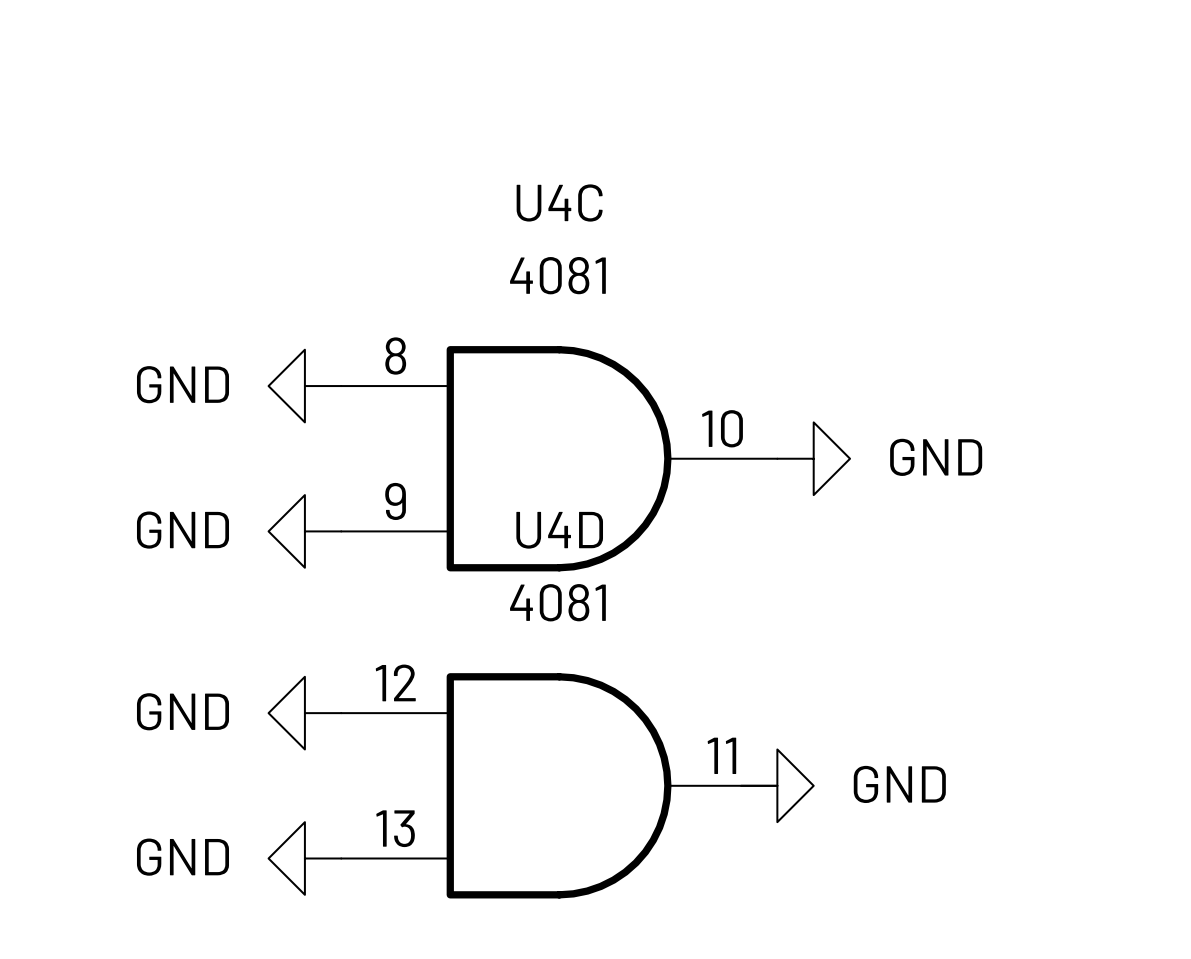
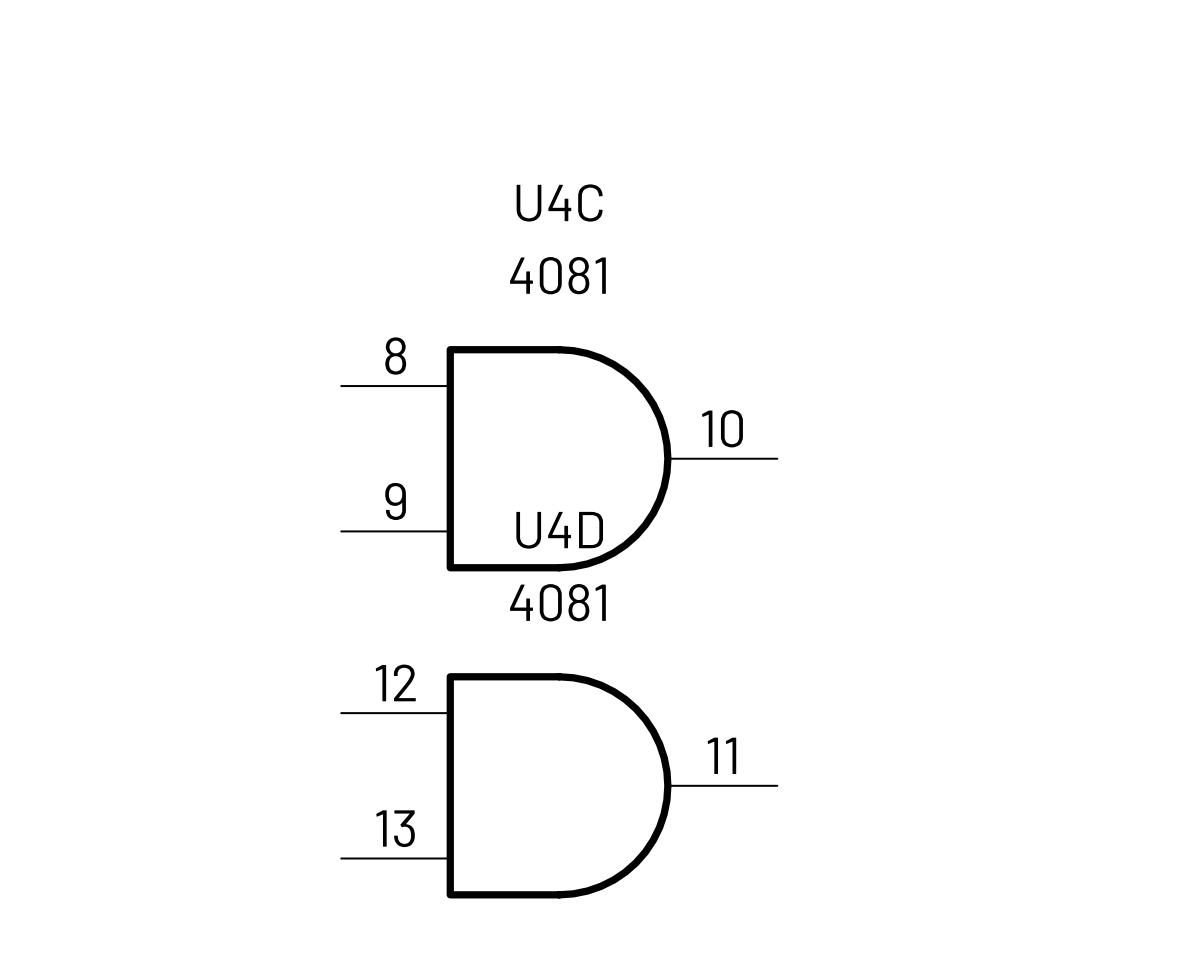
power symbol: GND (304, 386) -> none
power symbol: GND (813, 458) -> none
power symbol: GND (304, 531) -> none
power symbol: GND (304, 713) -> none
power symbol: GND (777, 785) -> none
power symbol: GND (304, 858) -> none

